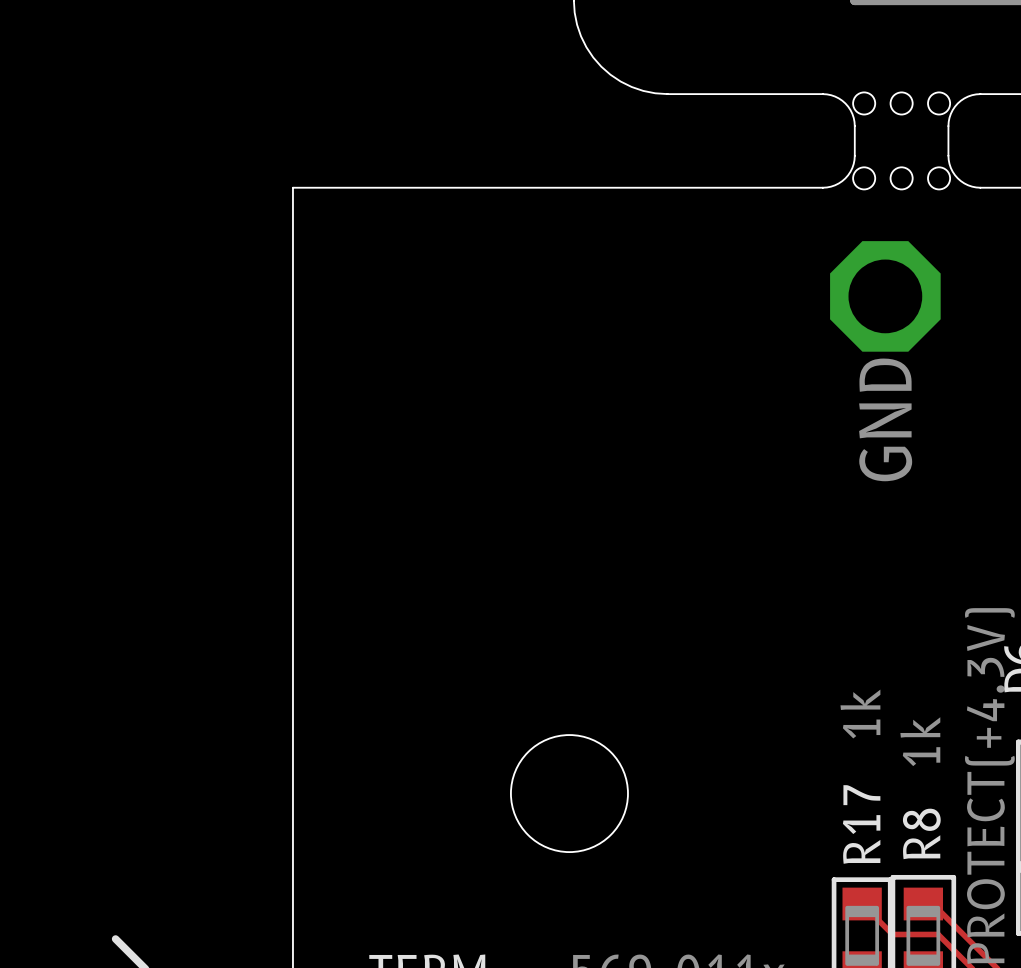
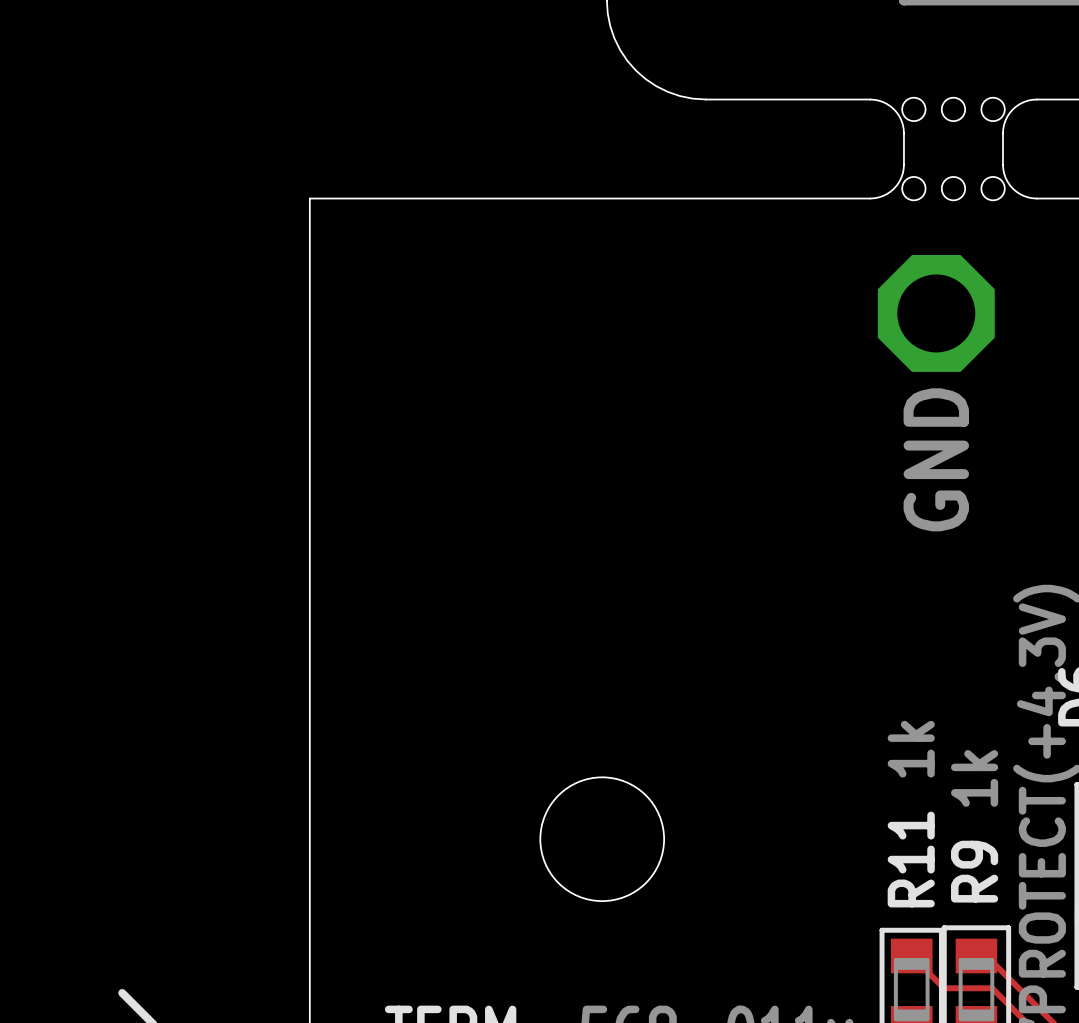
R17 name: R17 (861, 824) -> R11 (911, 859)
R8 name: R8 (921, 833) -> R9 (974, 871)

